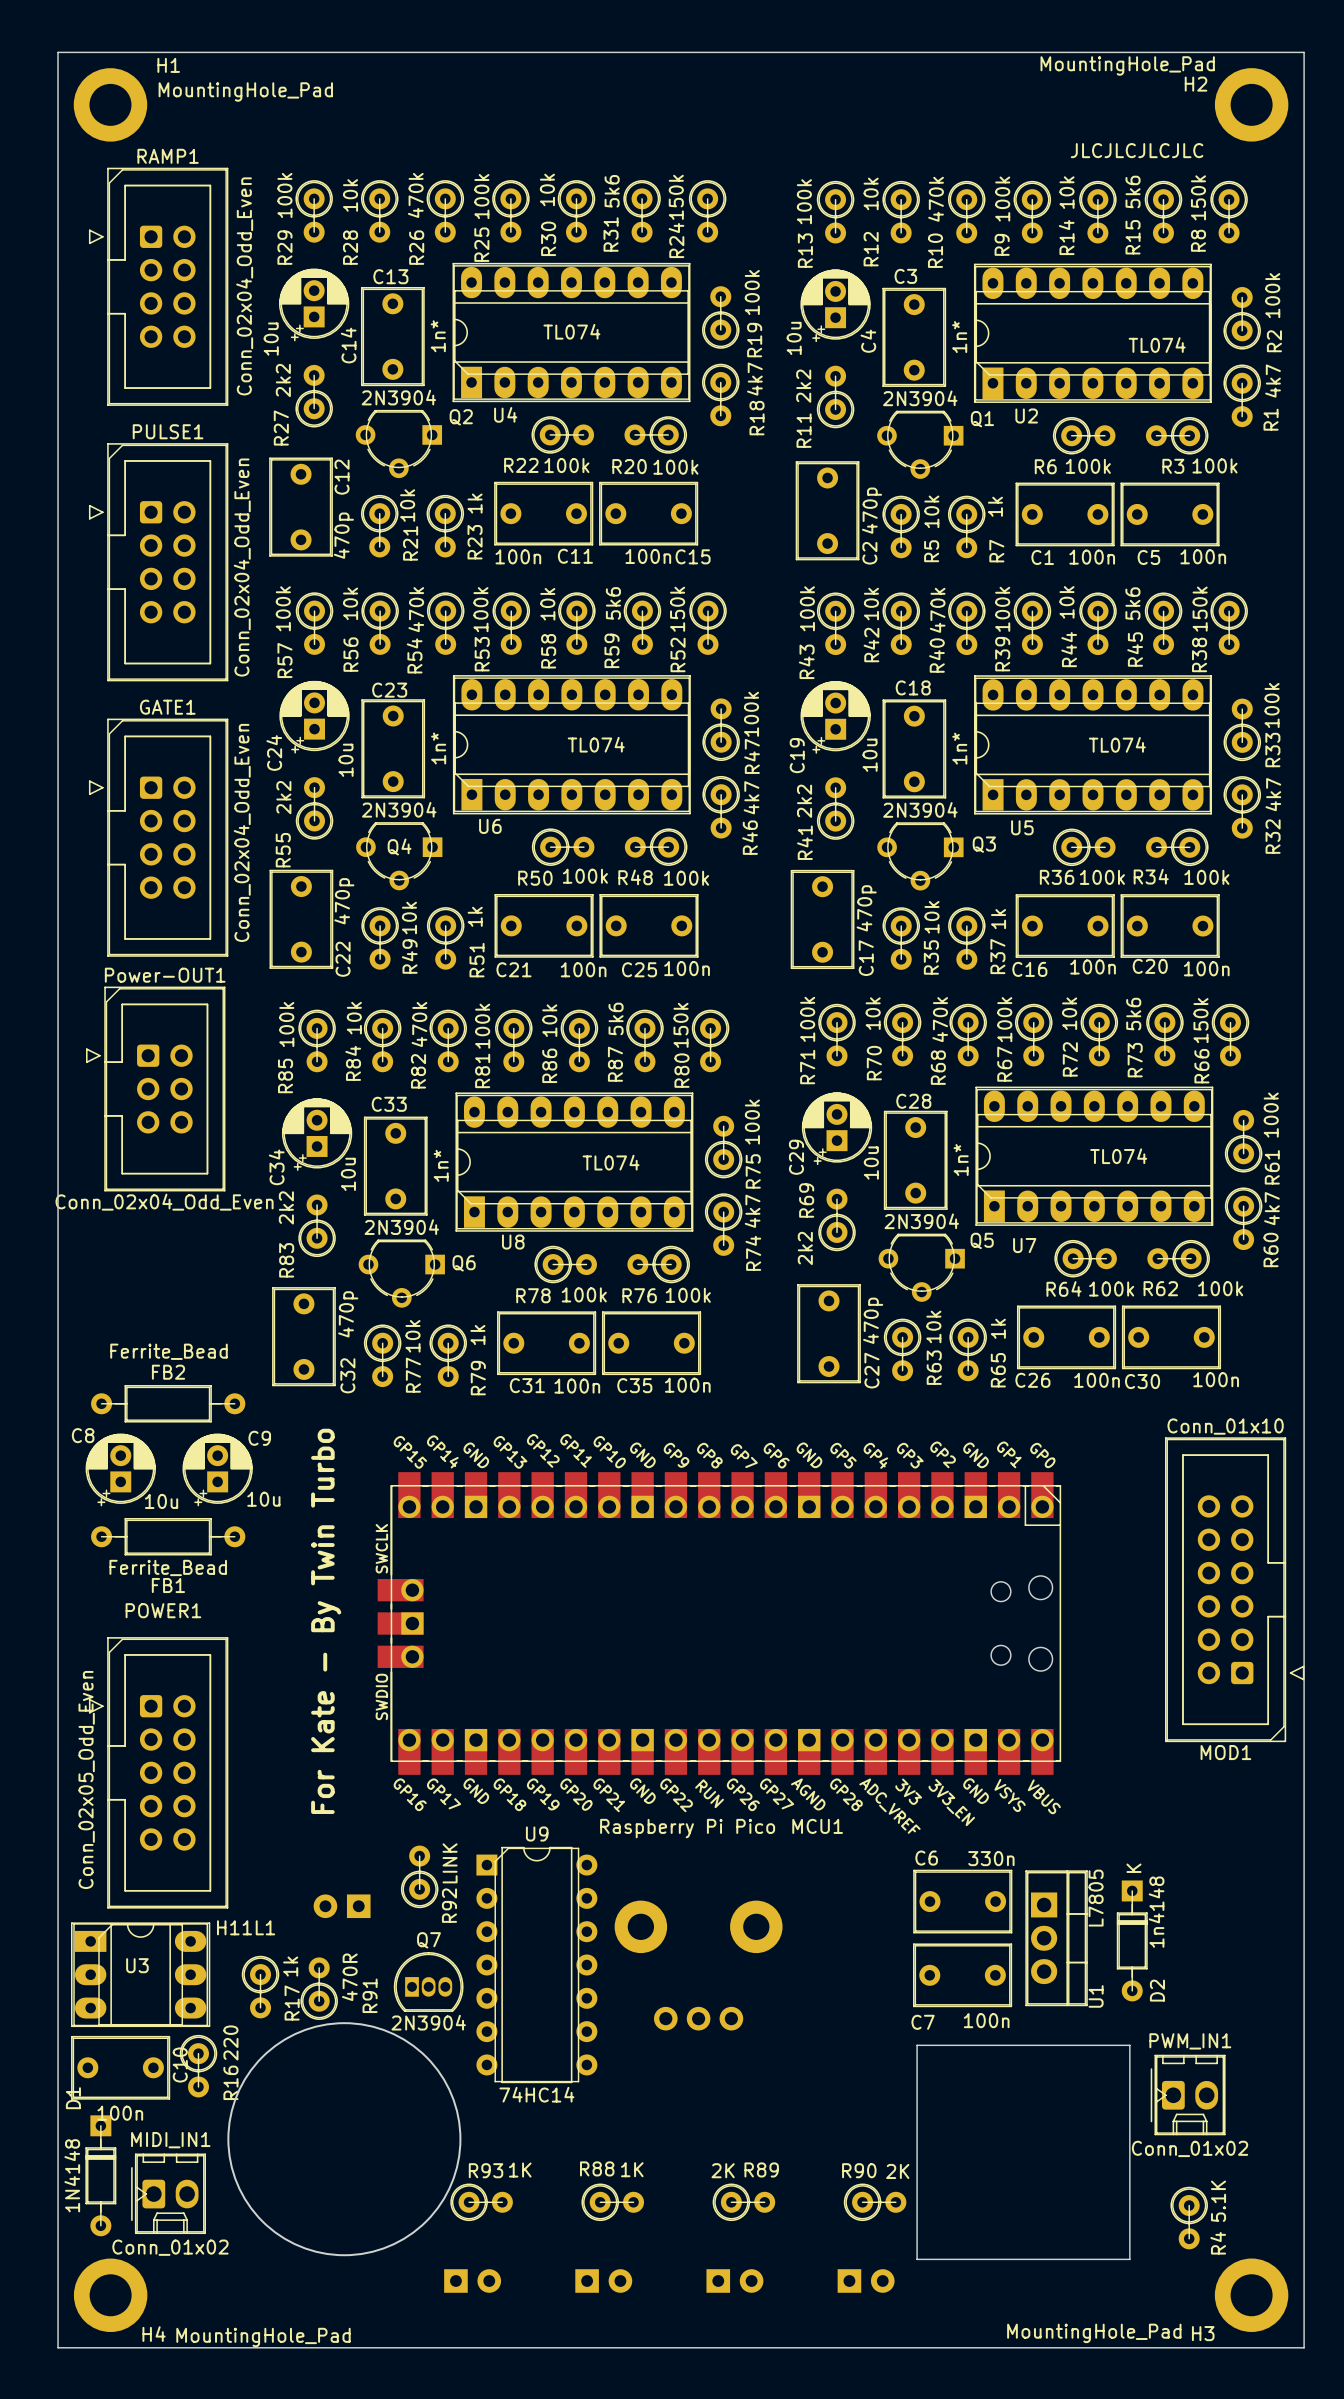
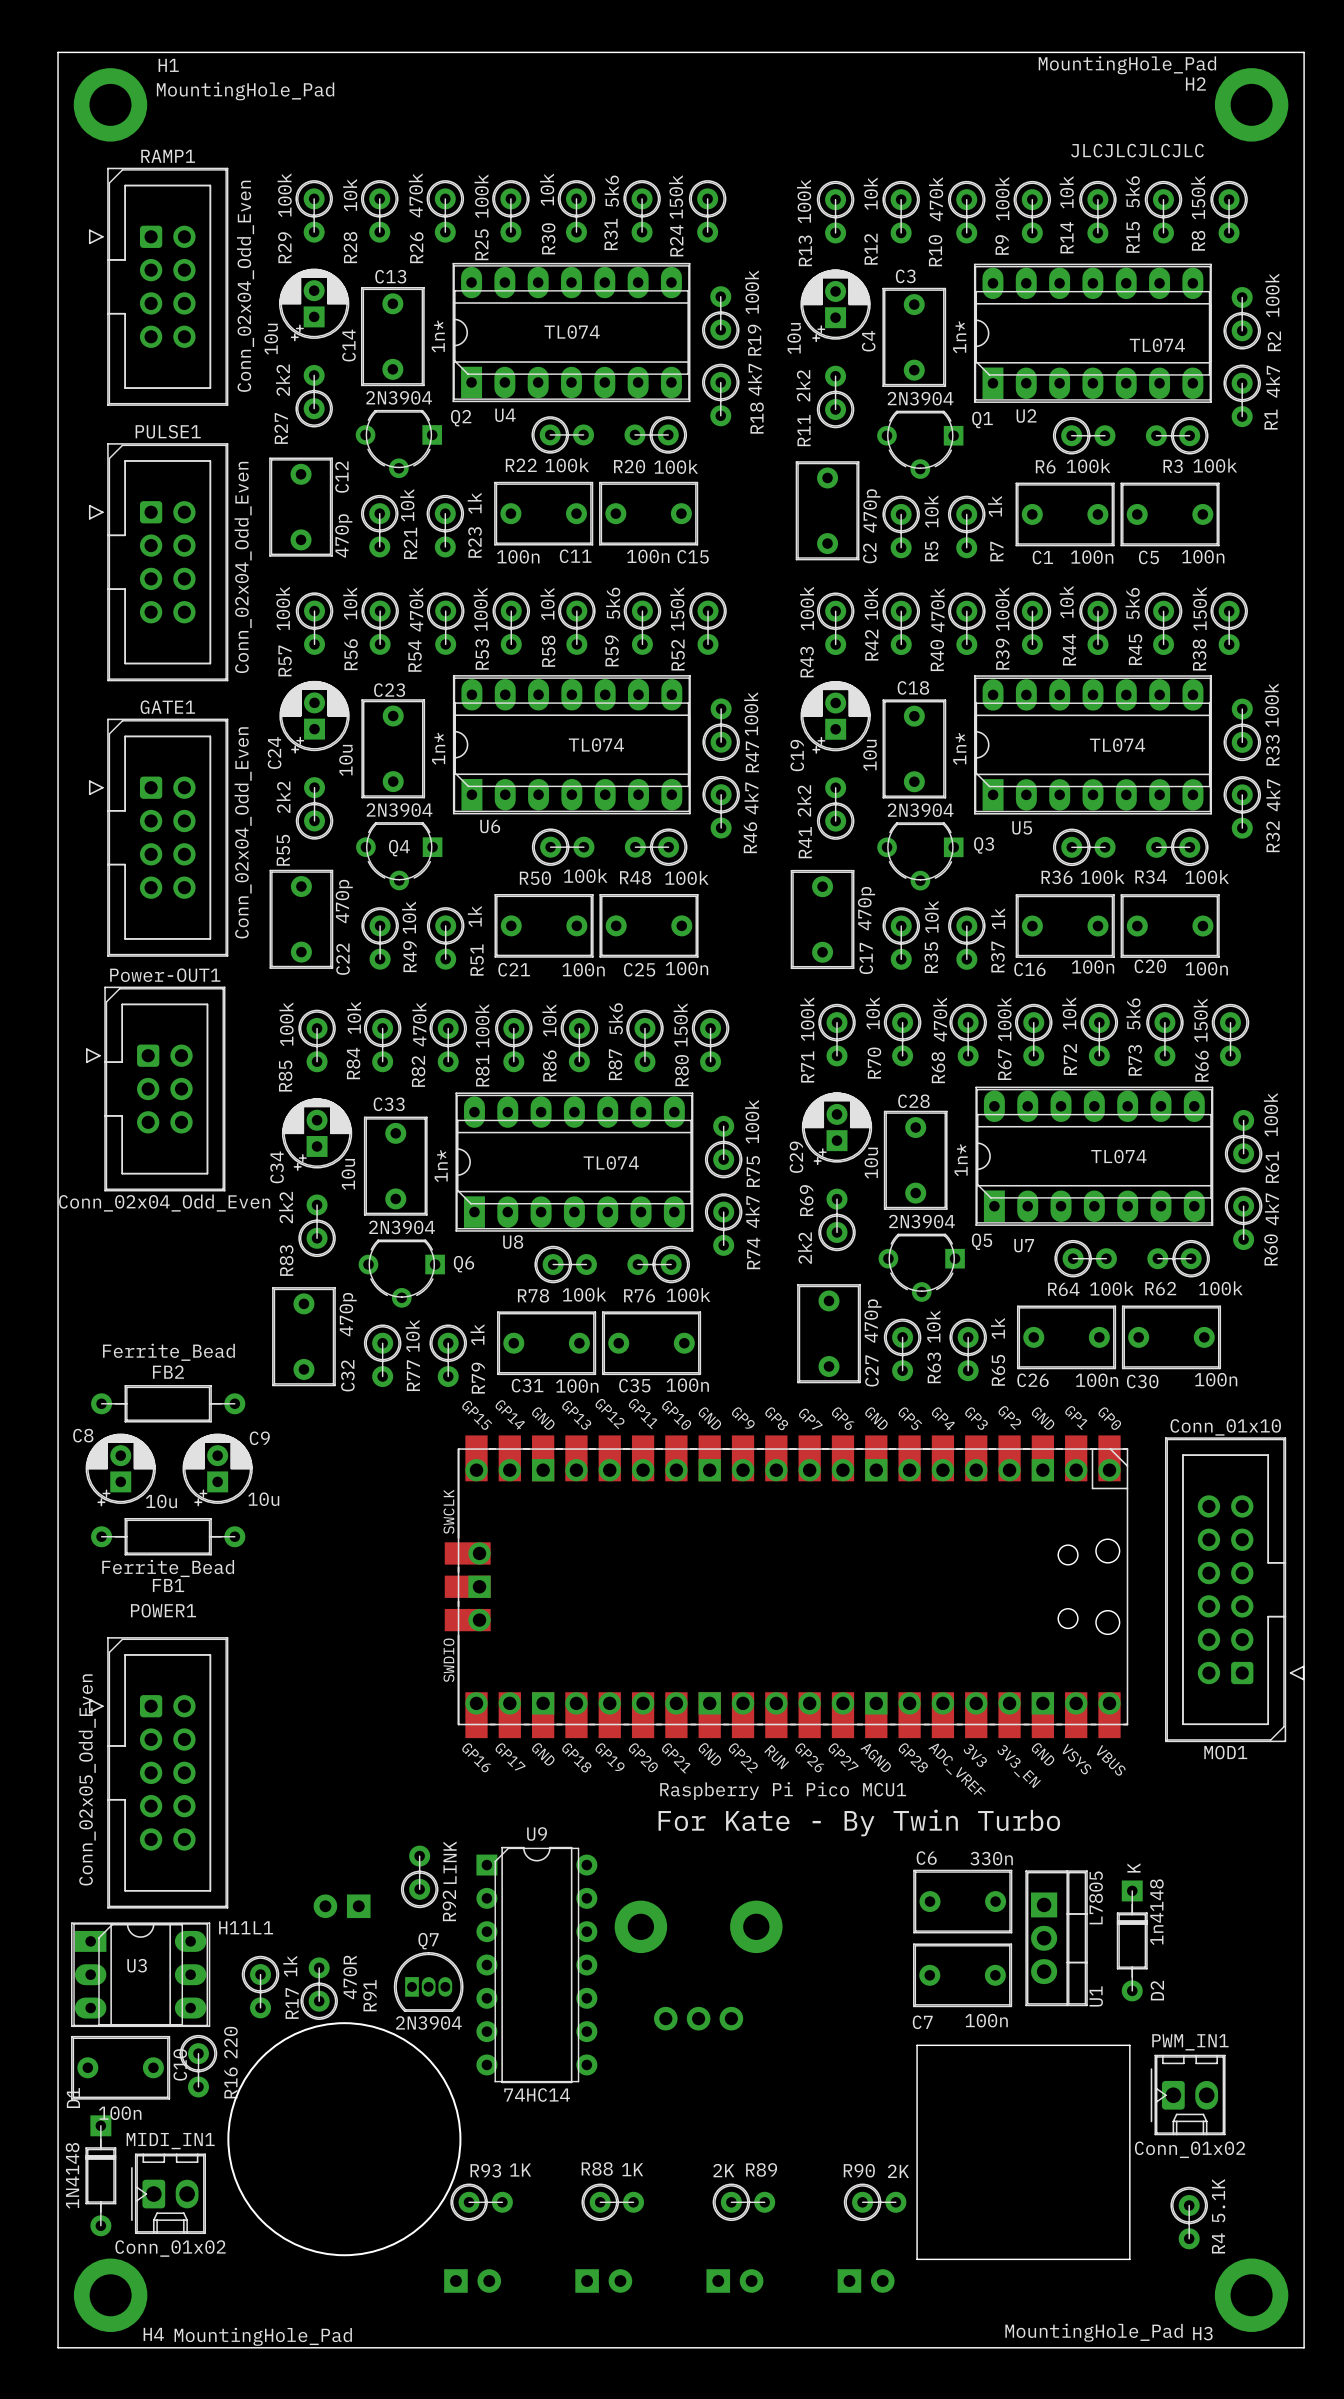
text: For Kate - By Twin Turbo (326, 1621) -> none
MCU1 position: (719, 1623) -> (786, 1586)
text: none -> For Kate - By Twin Turbo (859, 1822)

